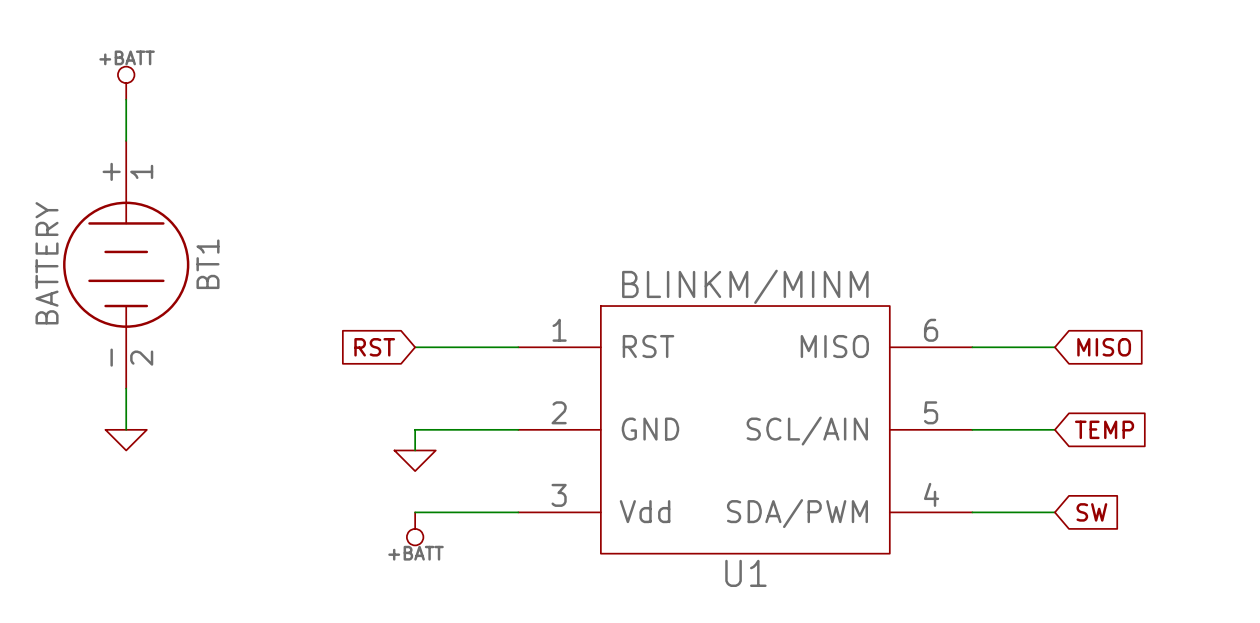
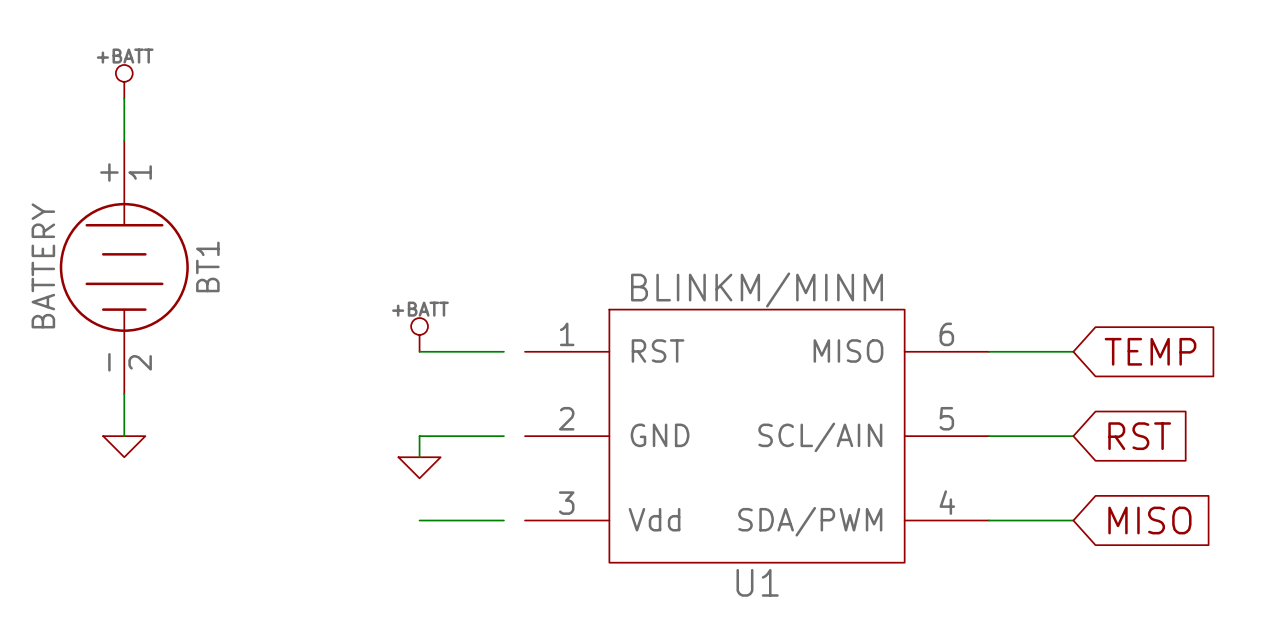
global label: RST (374, 347) -> none
wire: (497, 347) (518, 347) -> none
global label: MISO (1104, 347) -> TEMP (1150, 351)
wire: (497, 429) (518, 429) -> none
global label: TEMP (1104, 429) -> RST (1139, 436)
wire: (497, 512) (518, 512) -> none
global label: SW (1091, 512) -> MISO (1149, 520)
power symbol rotation: 0° (415, 528) -> 180° (419, 334)
power symbol position: +BATT (415, 528) -> +BATT (419, 334)

